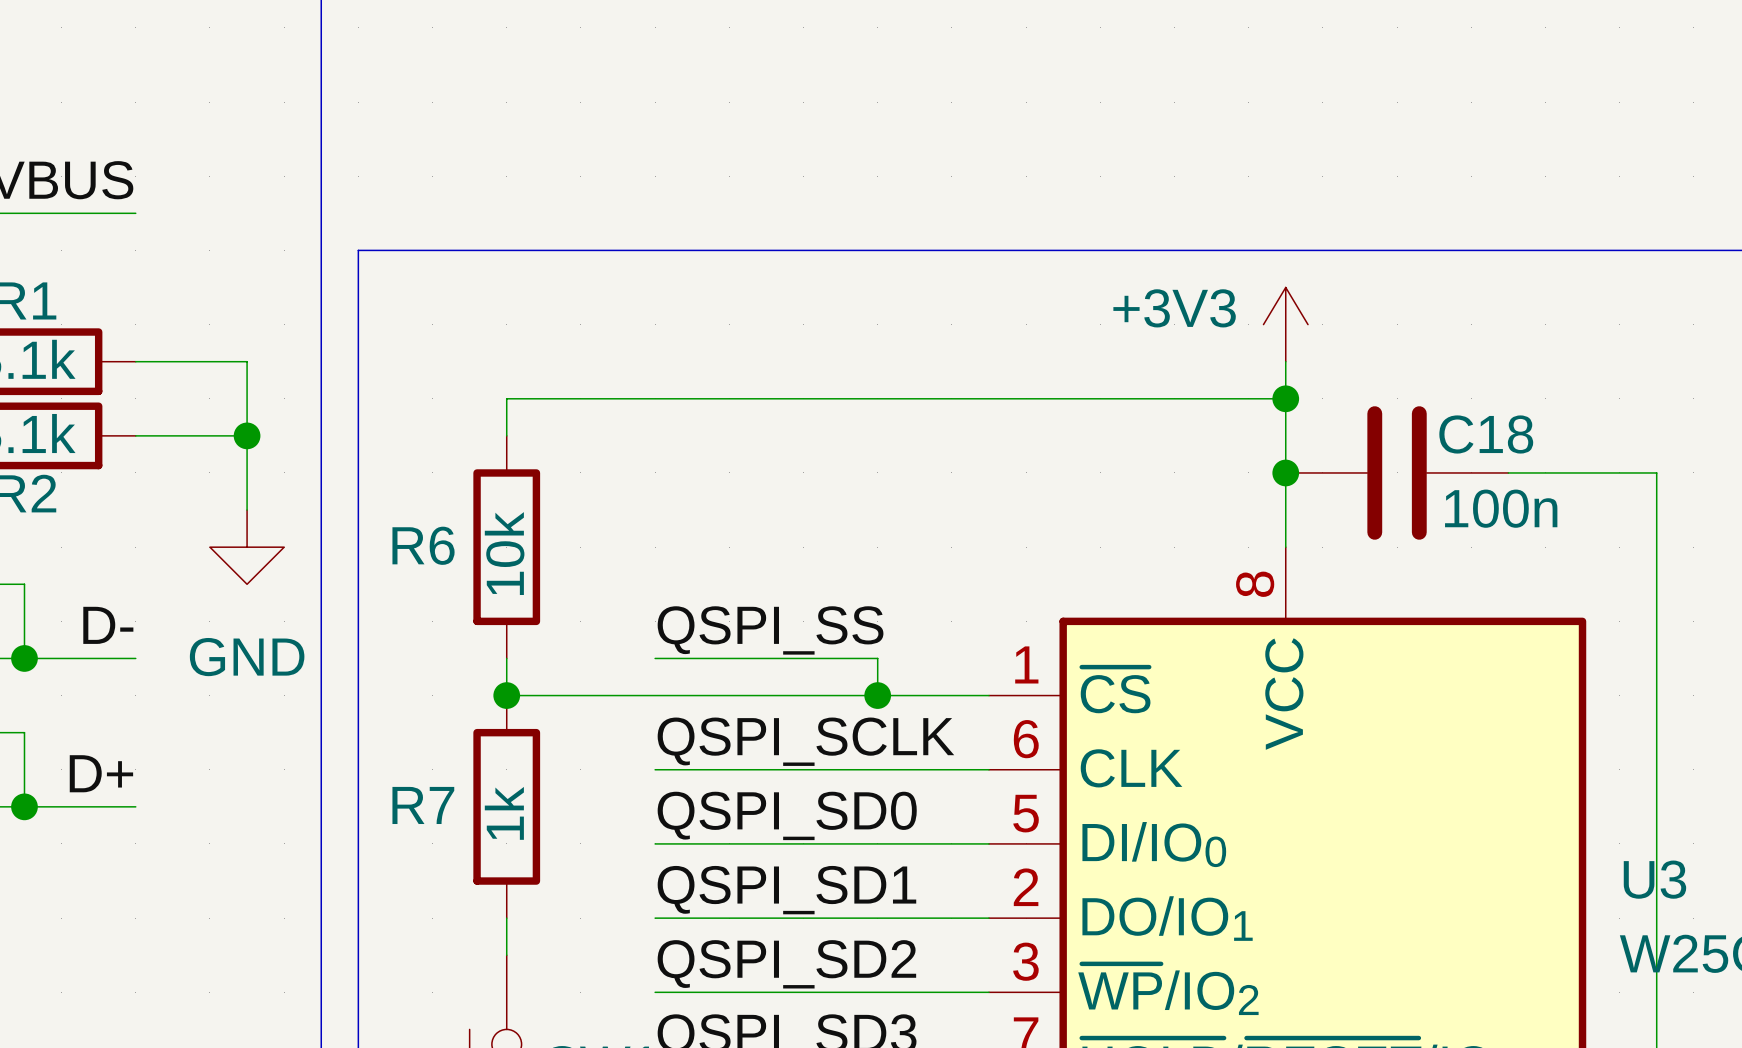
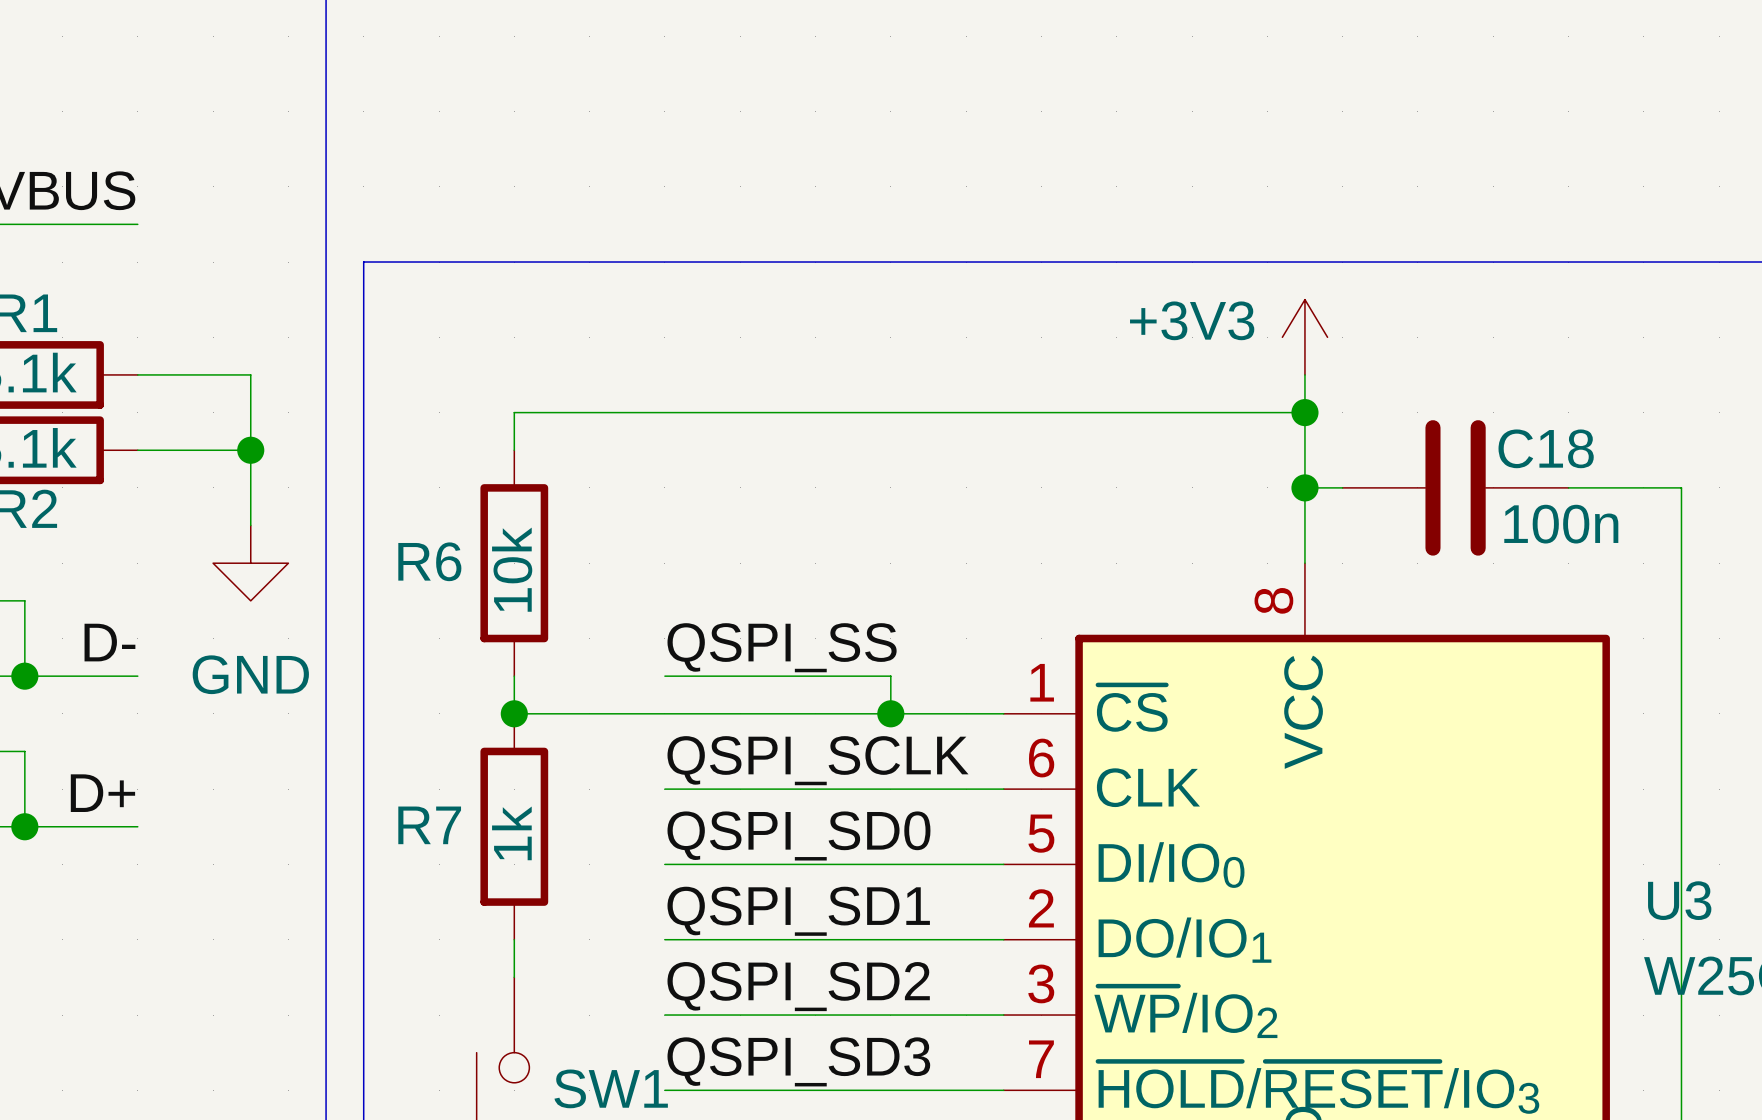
C18 position: (1397, 472) -> (1455, 487)

